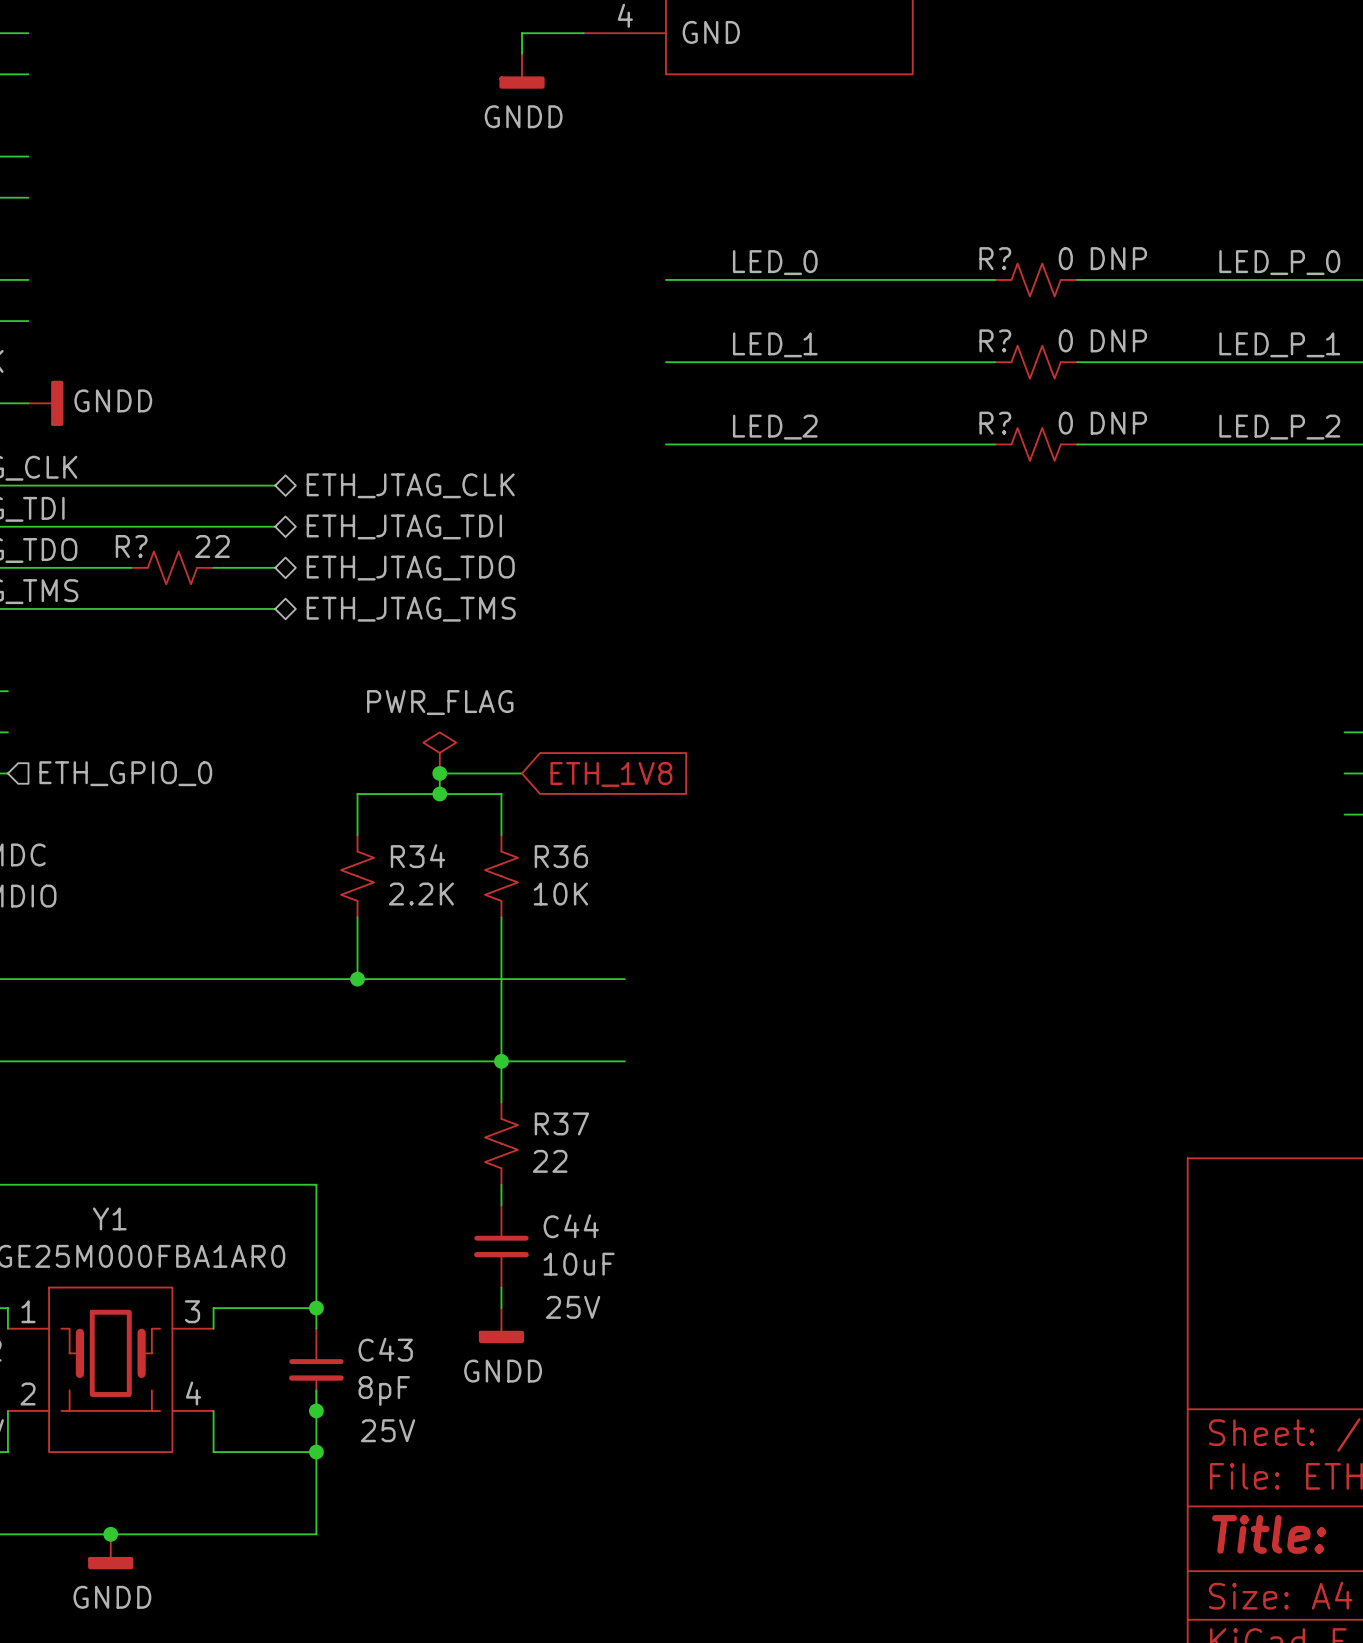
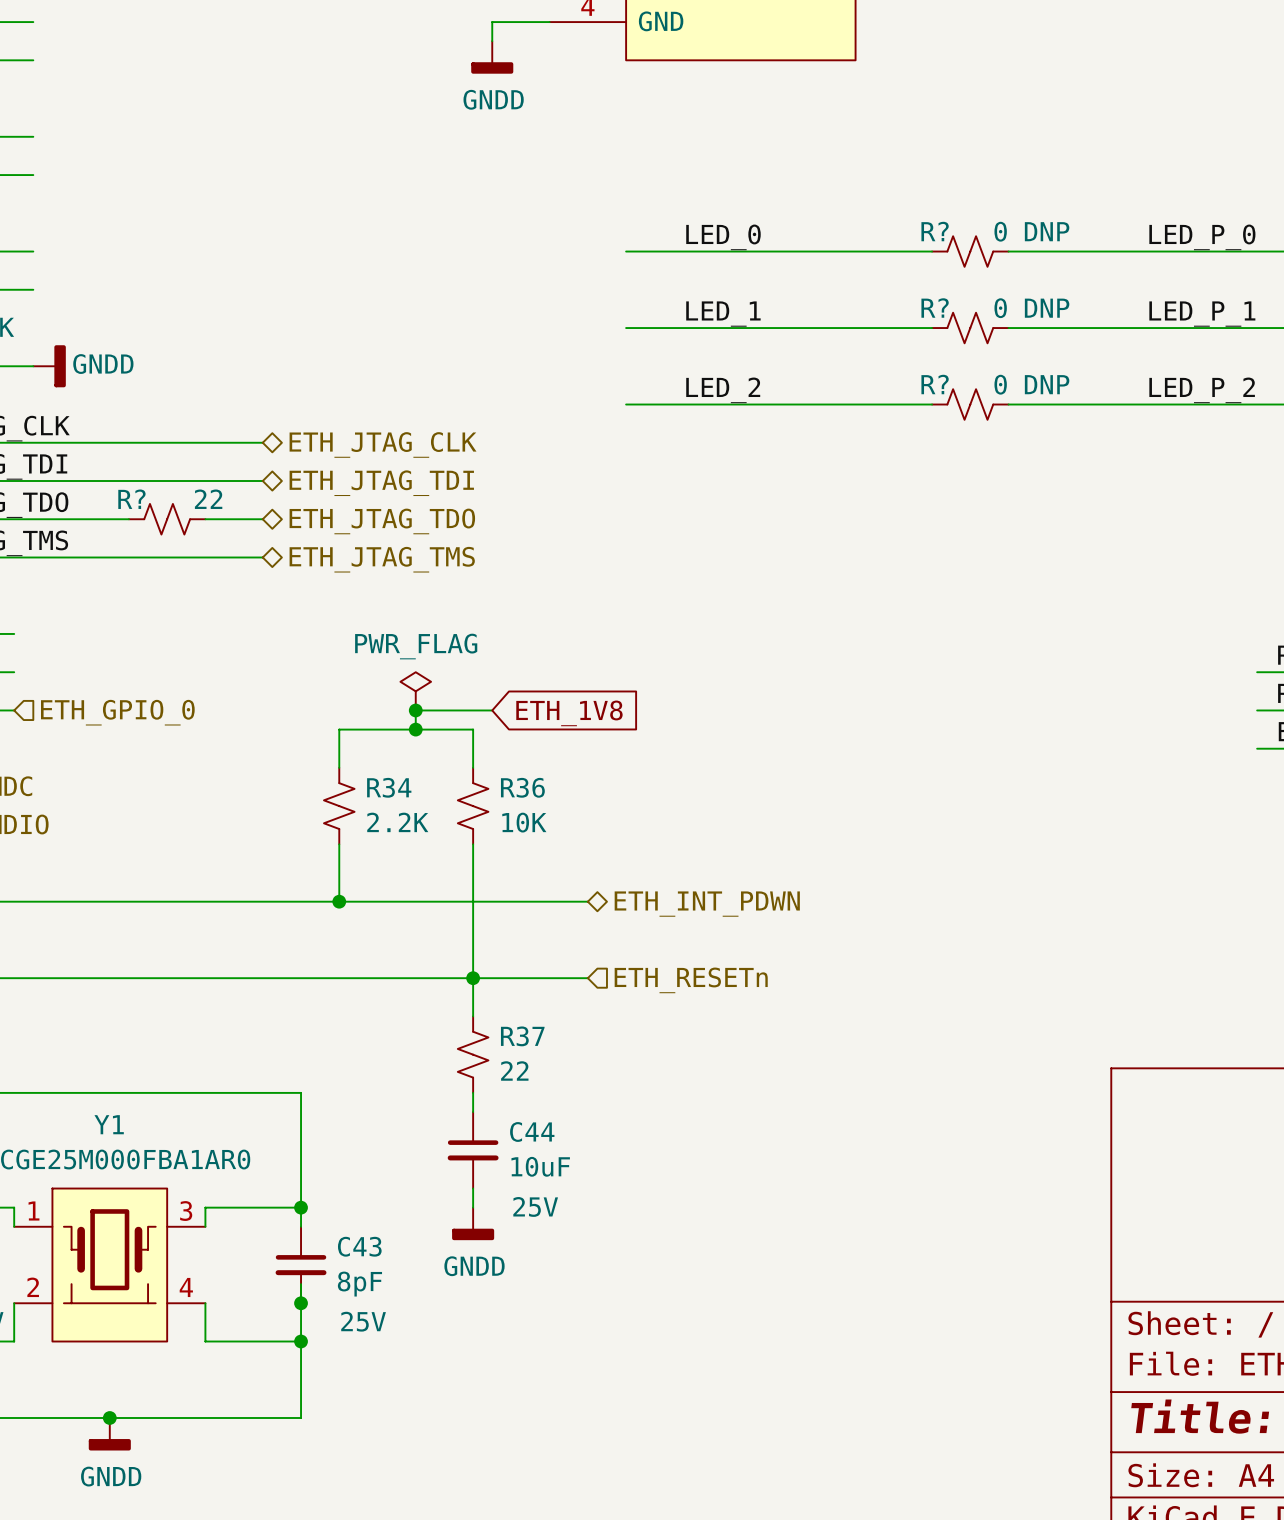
hierarchical label: none -> ETH_INT_PDWN (707, 904)
hierarchical label: none -> ETH_RESETn (691, 980)

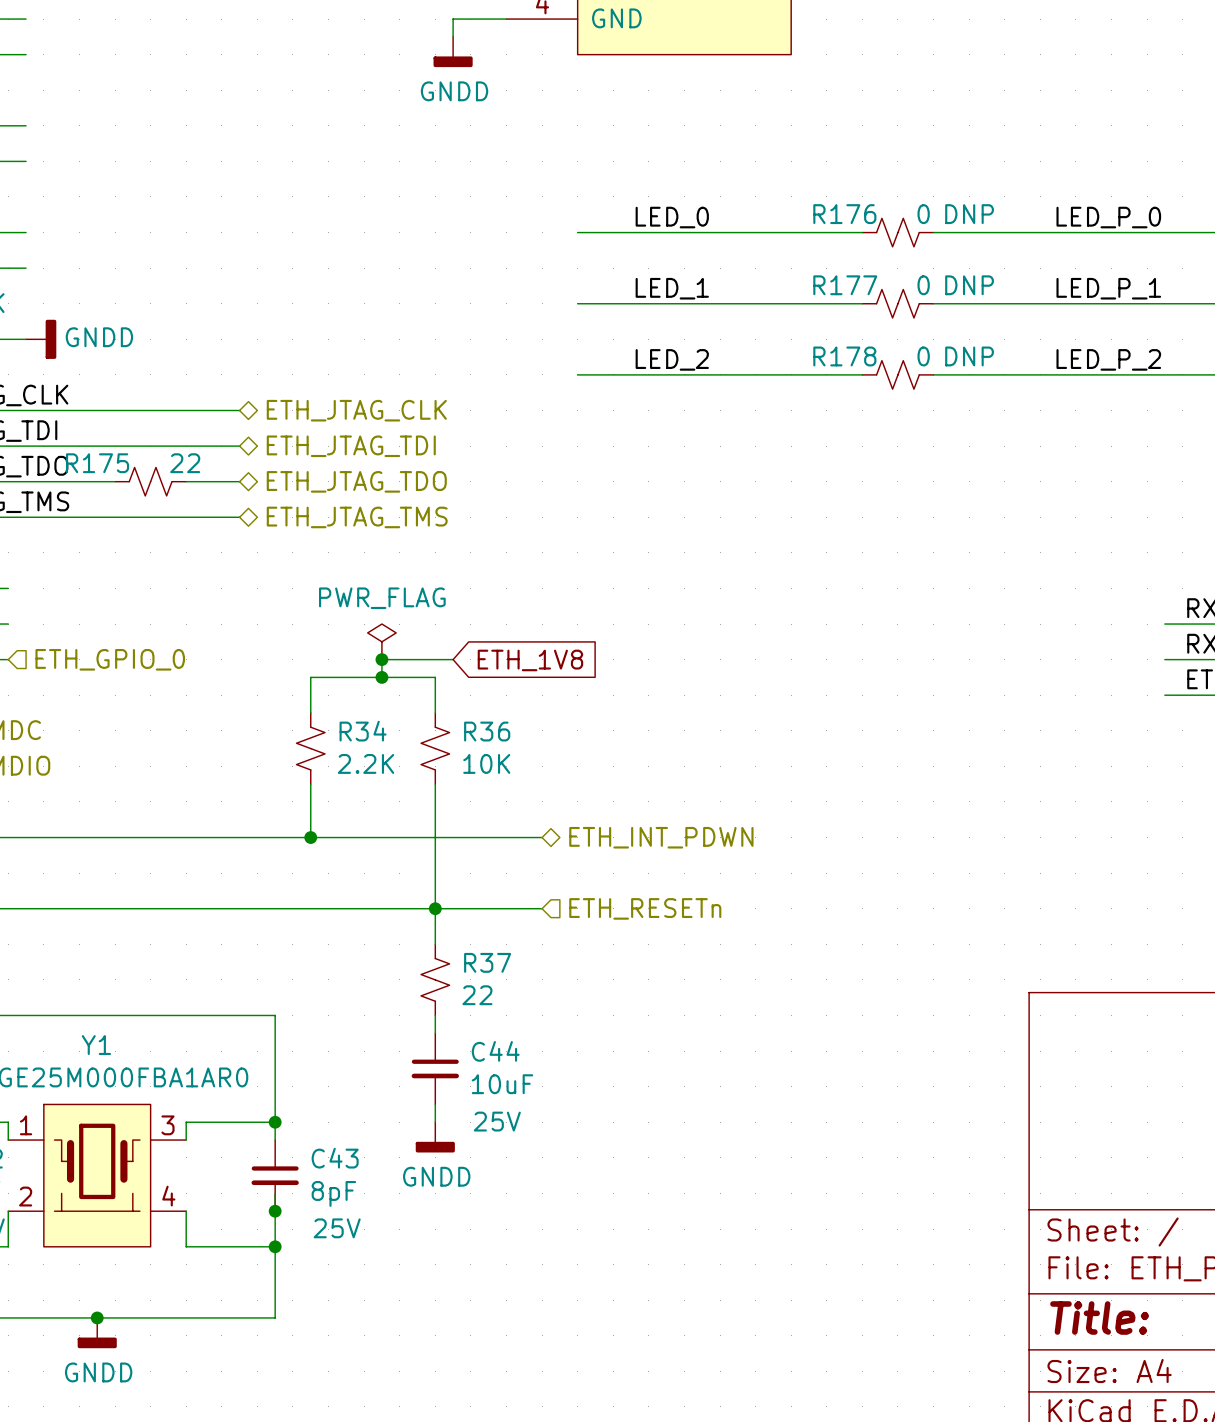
R? name: R? (935, 231) -> R176 (844, 214)
R? name: R? (935, 308) -> R177 (845, 285)
R? name: R? (935, 384) -> R178 (844, 356)
R? name: R? (131, 499) -> R175 (97, 463)

